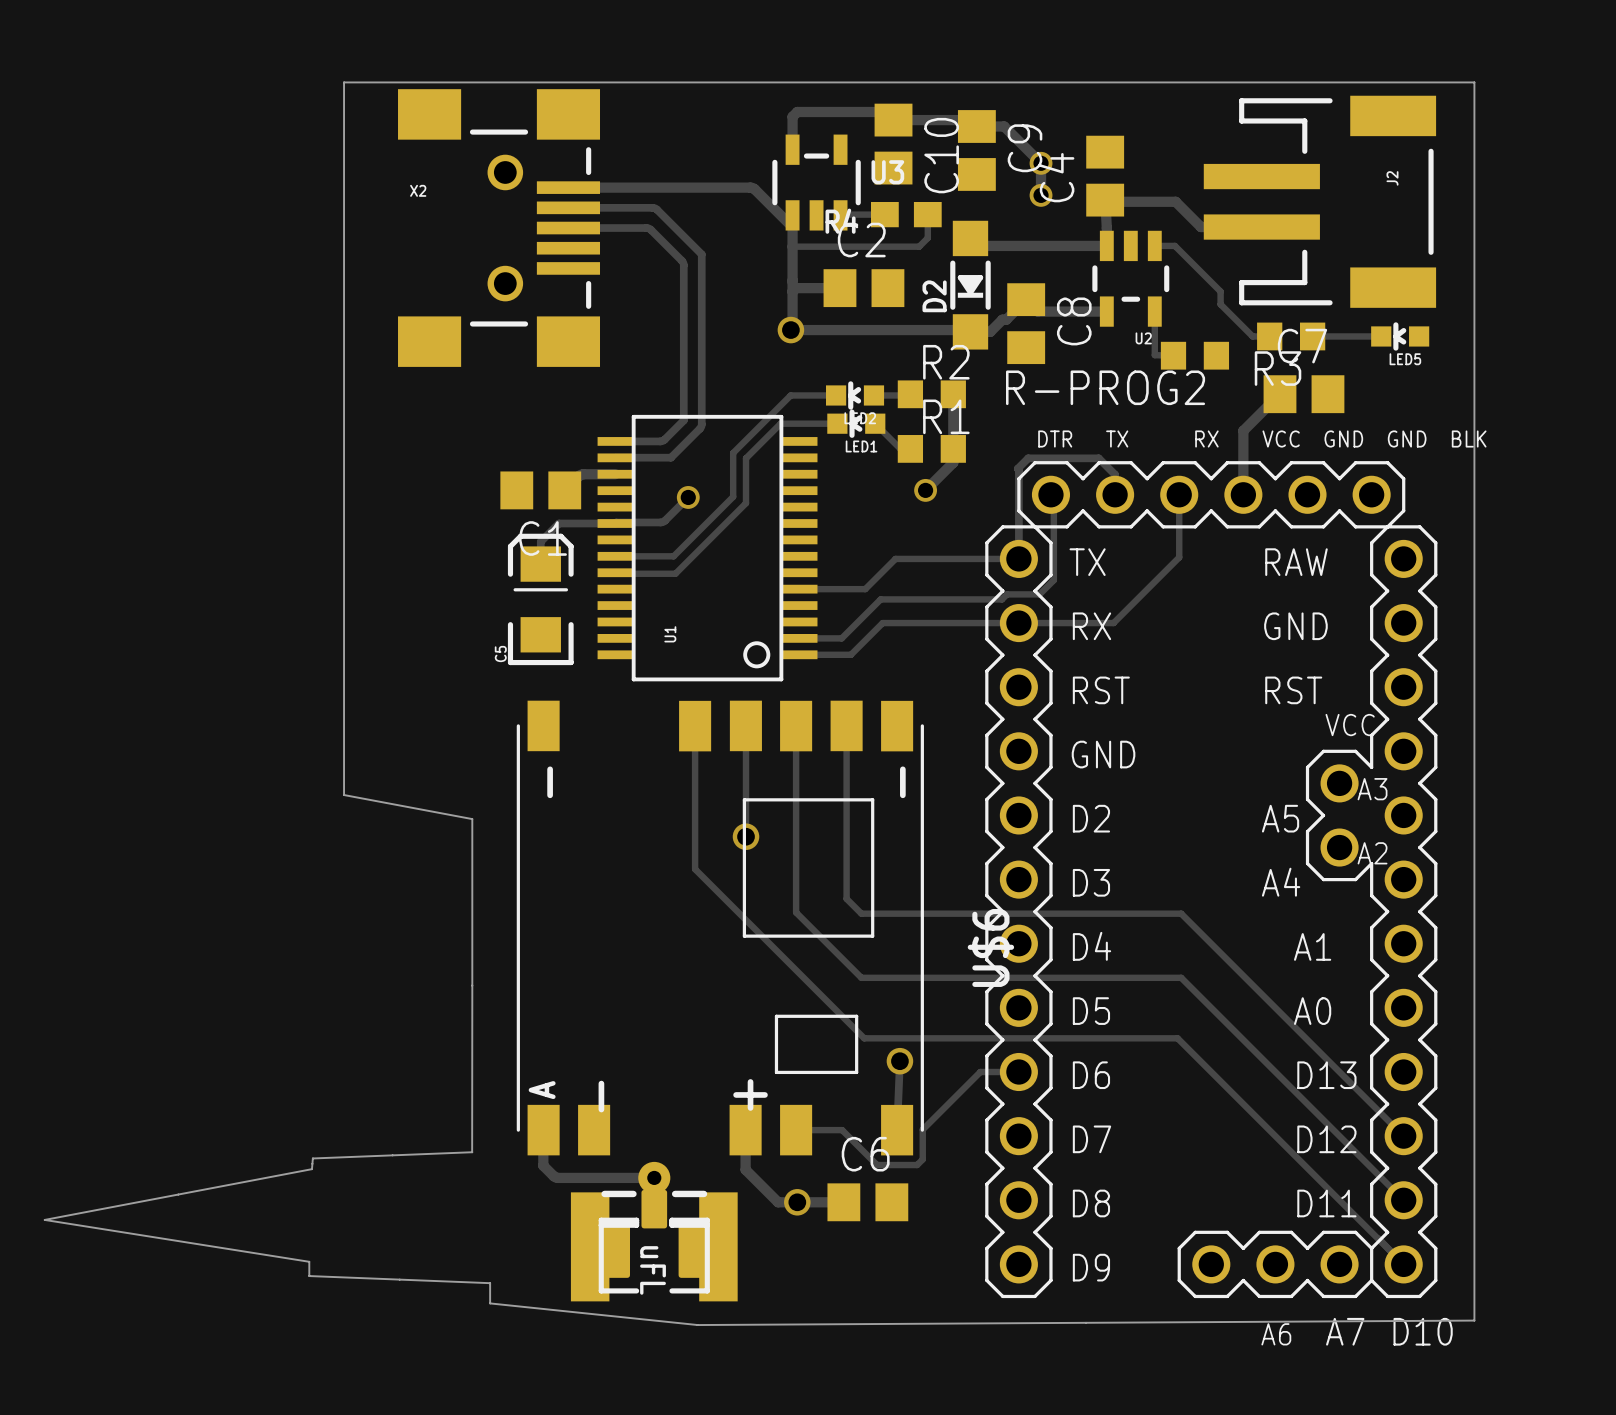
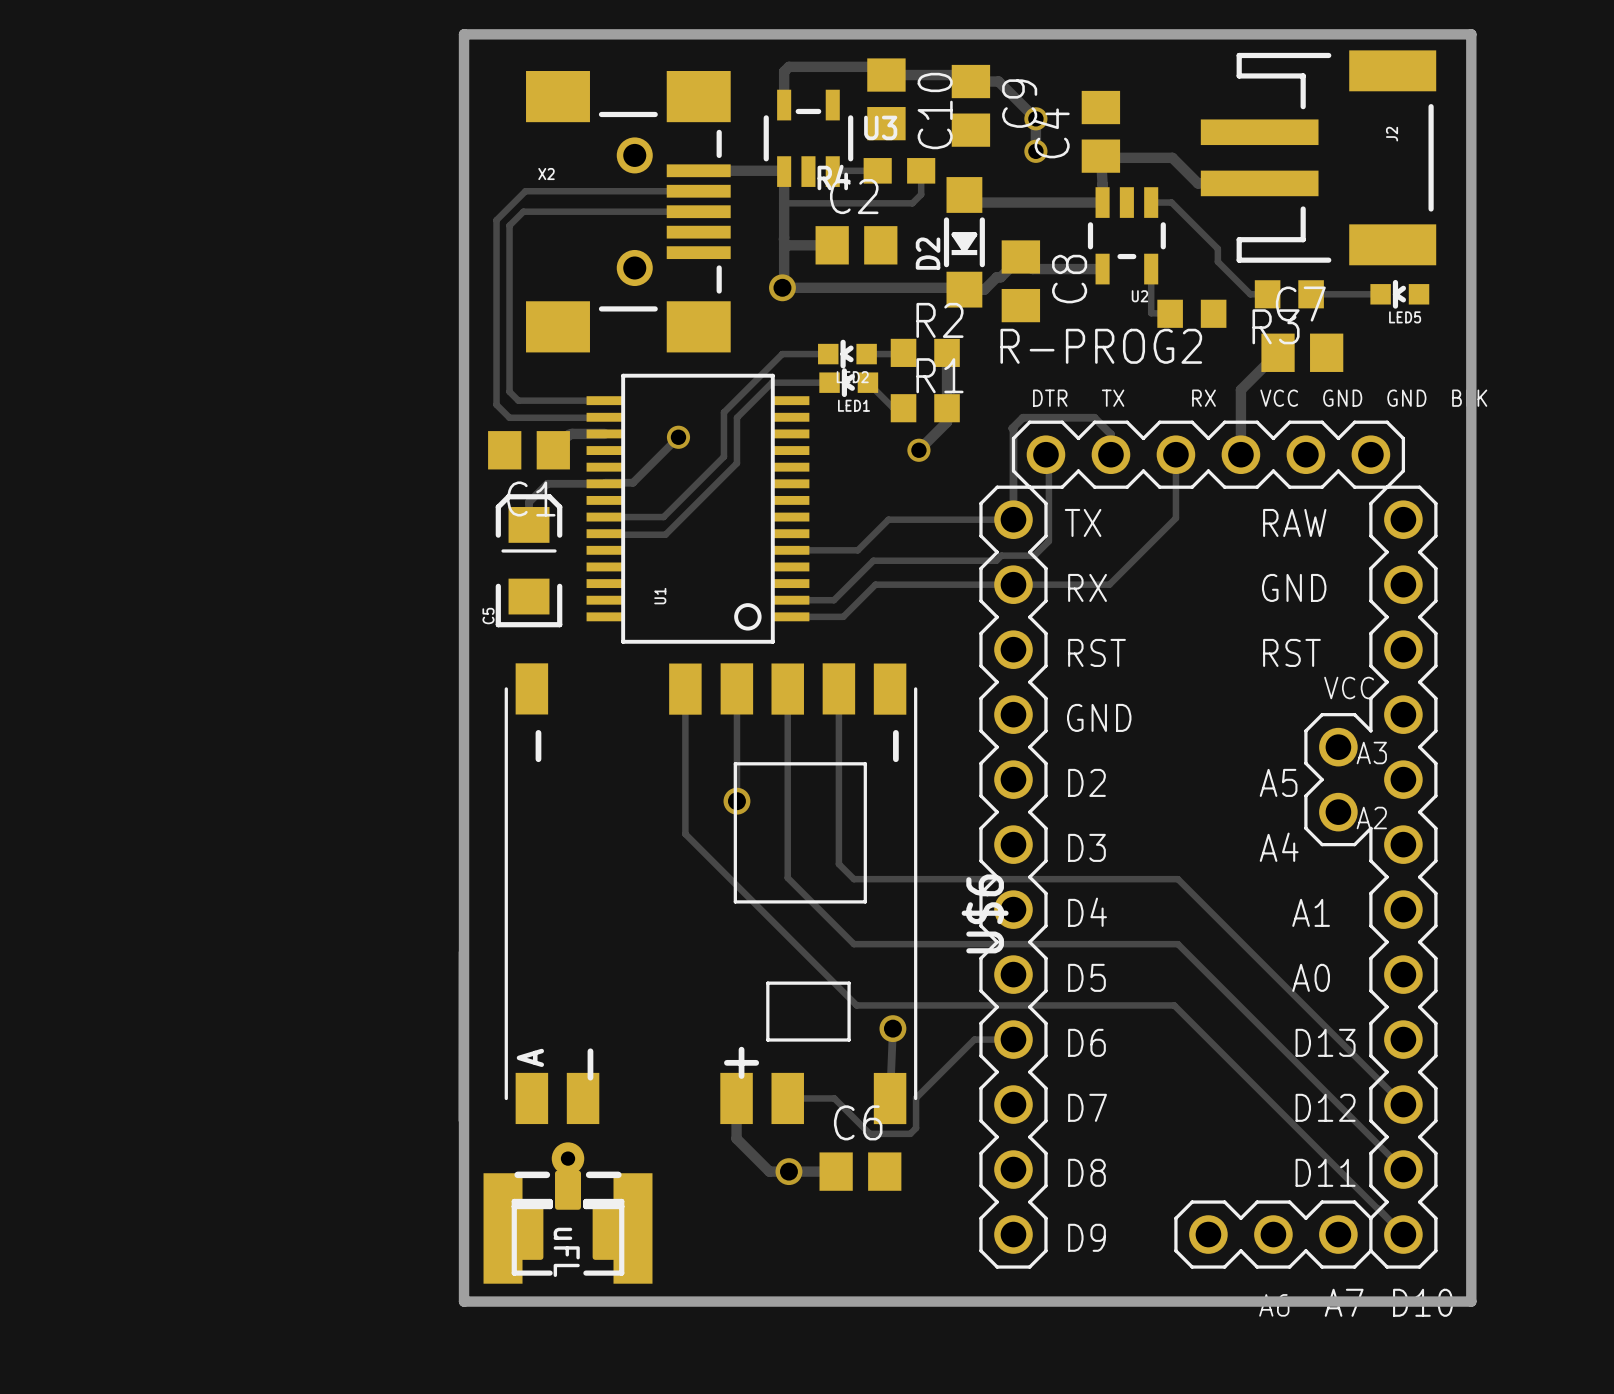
board edge: none -> (464, 34) (1471, 34) (1471, 1301) (464, 1301) (464, 34)
track: (568, 187) (751, 187) (792, 227) -> none
track: (568, 207) (655, 208) (701, 254) (701, 426) (670, 457) (615, 457) -> (698, 191) (525, 191) (496, 220) (496, 404) (509, 417) (603, 417)
track: none -> (698, 170) (783, 170)
track: (568, 226) (648, 228) (683, 263) (683, 420) (661, 441) (615, 441) -> (698, 211) (523, 211) (509, 225) (509, 391) (518, 400) (604, 400)
X2 position: (499, 228) -> (628, 211)
track: (688, 497) (663, 521) (643, 522) -> (678, 437) (632, 482)
via position: (688, 497) -> (678, 437)
board edge: (472, 985) (472, 819) (344, 795) (344, 82) (1474, 82) (1474, 1320) (697, 1325) (490, 1303) (490, 1283) (309, 1276) (309, 1261) (44, 1219) (311, 1169) (312, 1158) (472, 1152) -> none
track: (543, 1130) (543, 1165) (554, 1176) (654, 1177) (654, 1209) -> none
part position: (654, 1231) -> (568, 1213)

